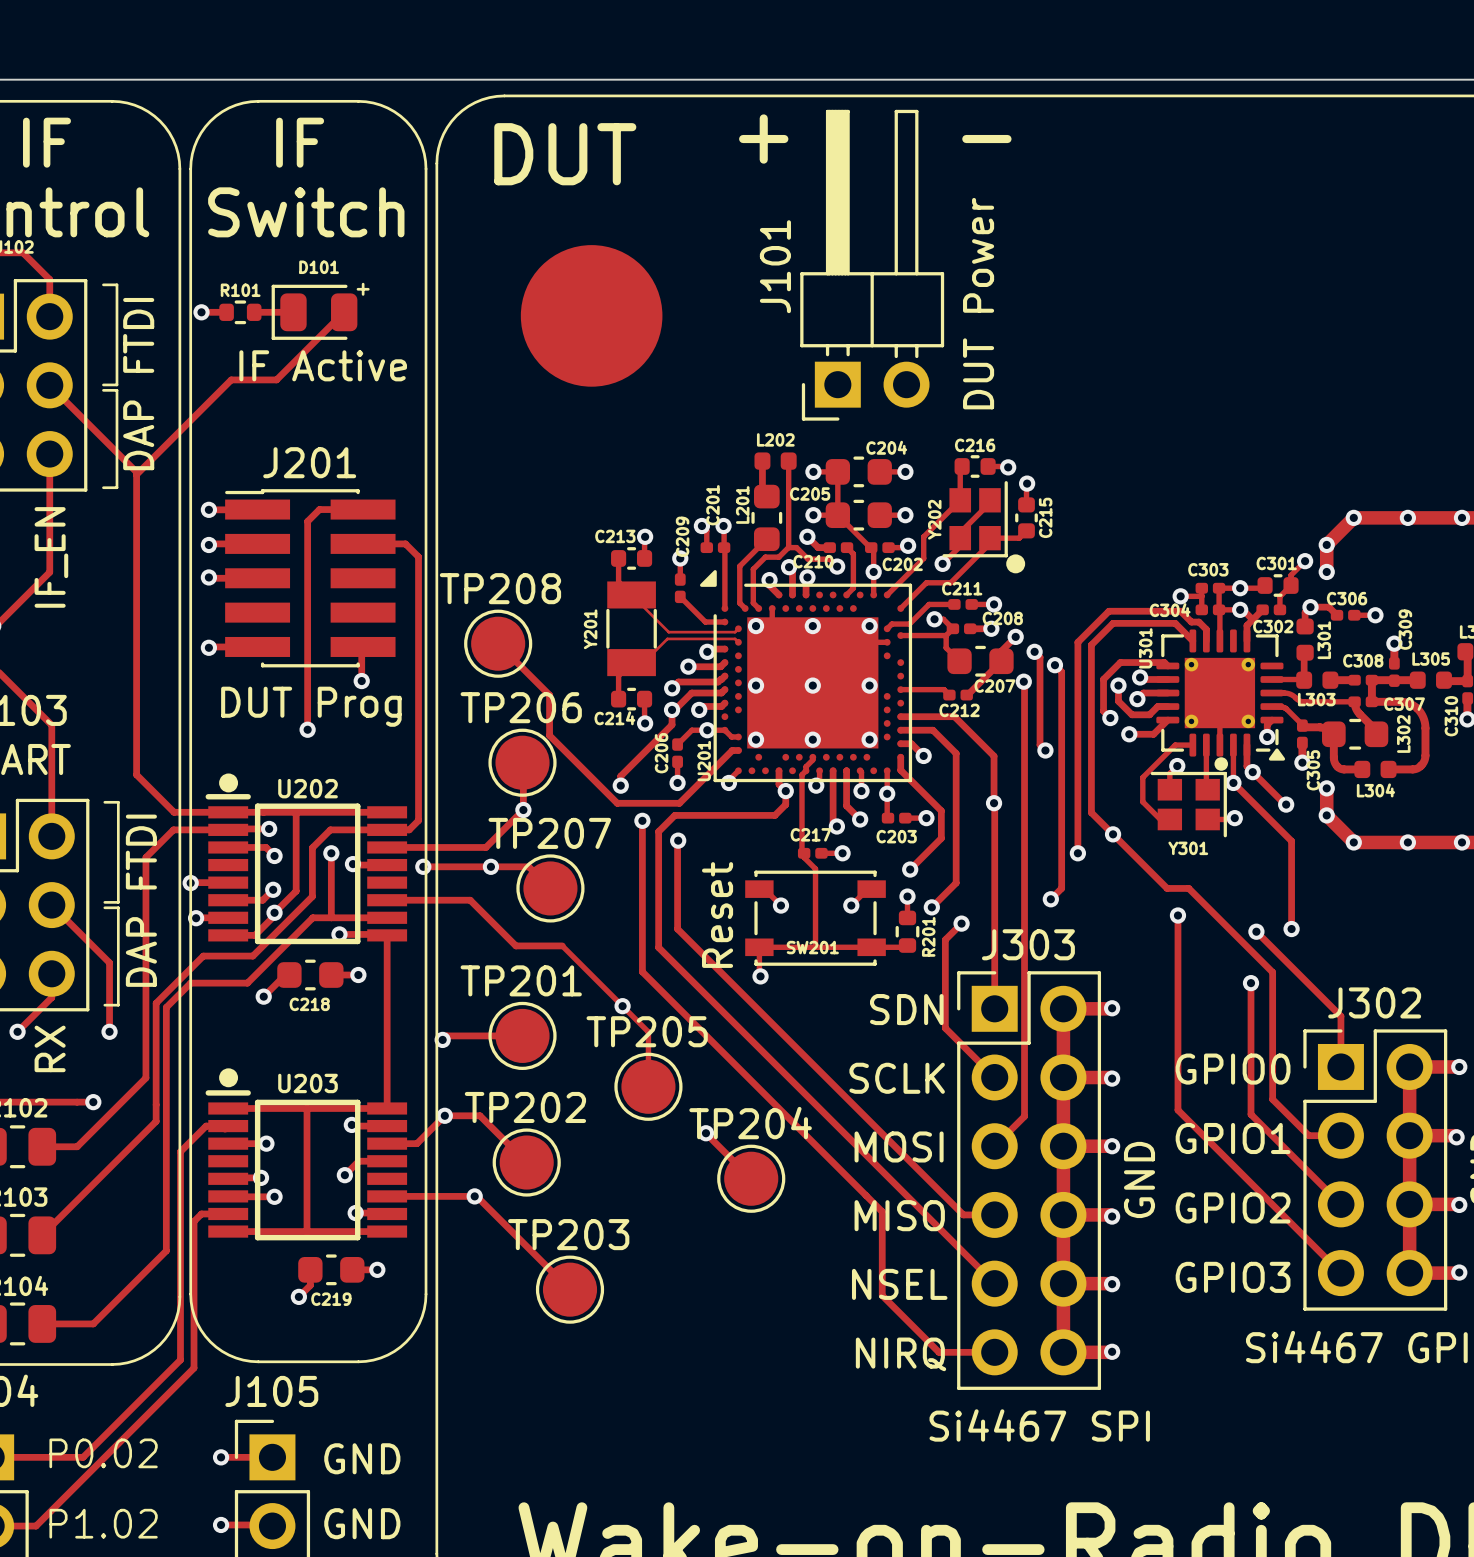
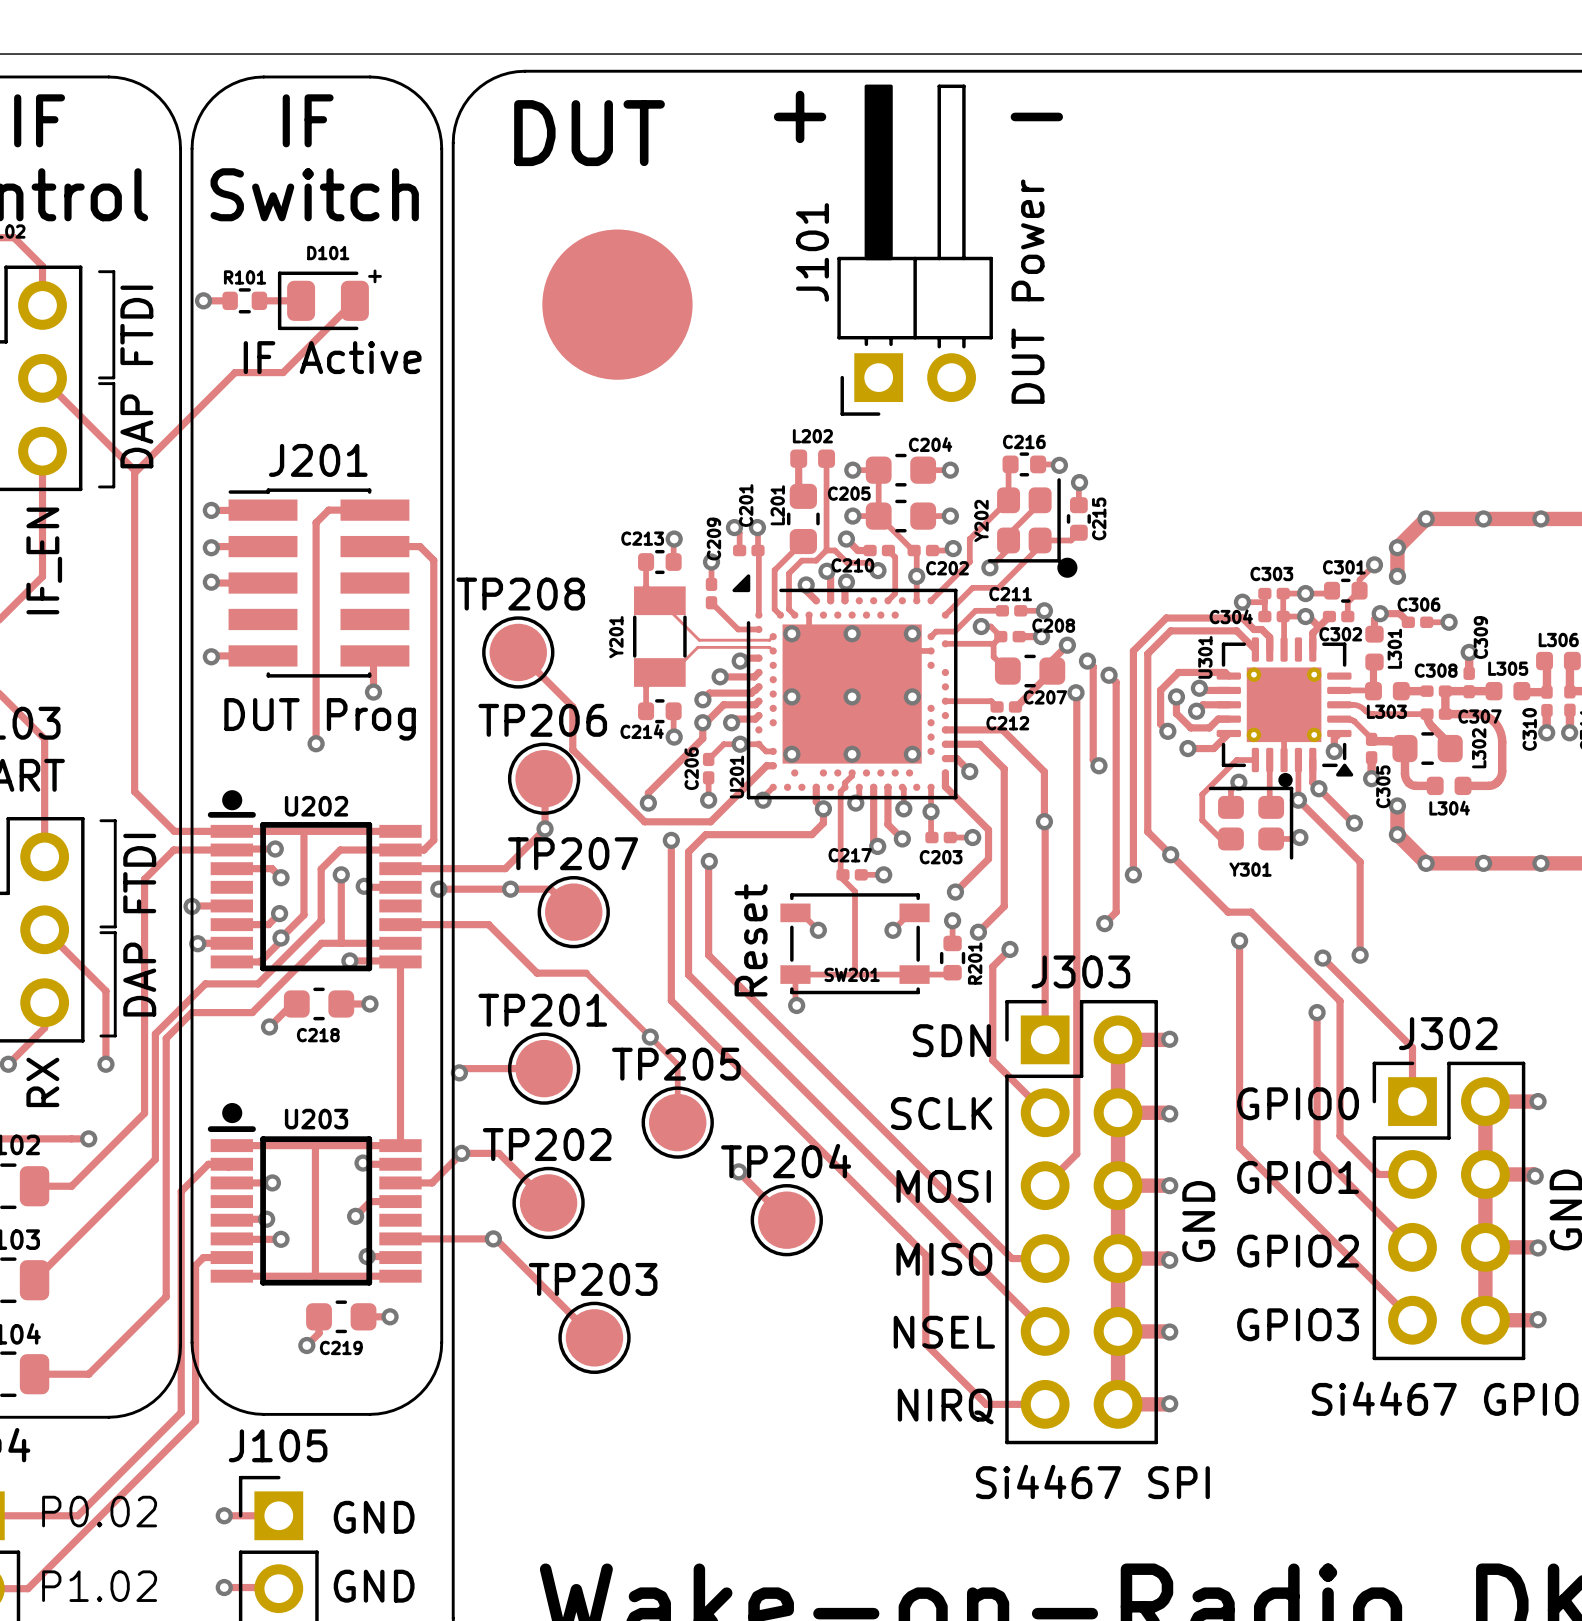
J101 footprint: [800, 109, 945, 421] -> [837, 84, 993, 416]
Y202 footprint: [942, 481, 1008, 558] -> [987, 478, 1061, 563]
Y301 footprint: [1150, 771, 1227, 838] -> [1208, 786, 1294, 860]

